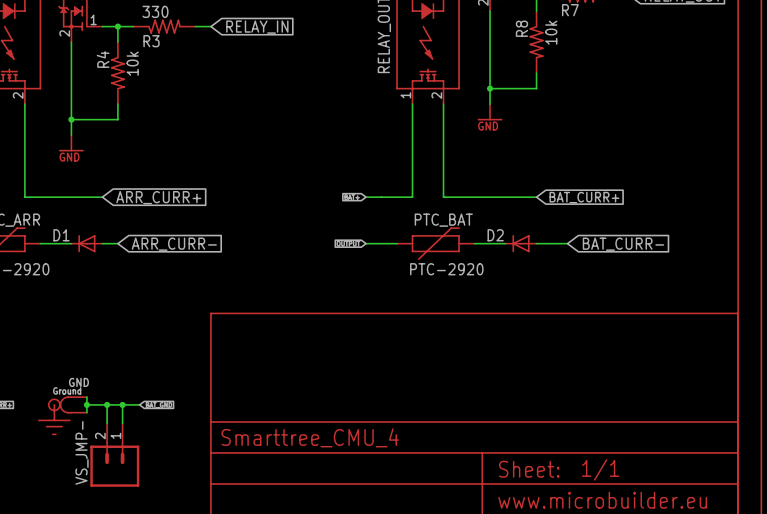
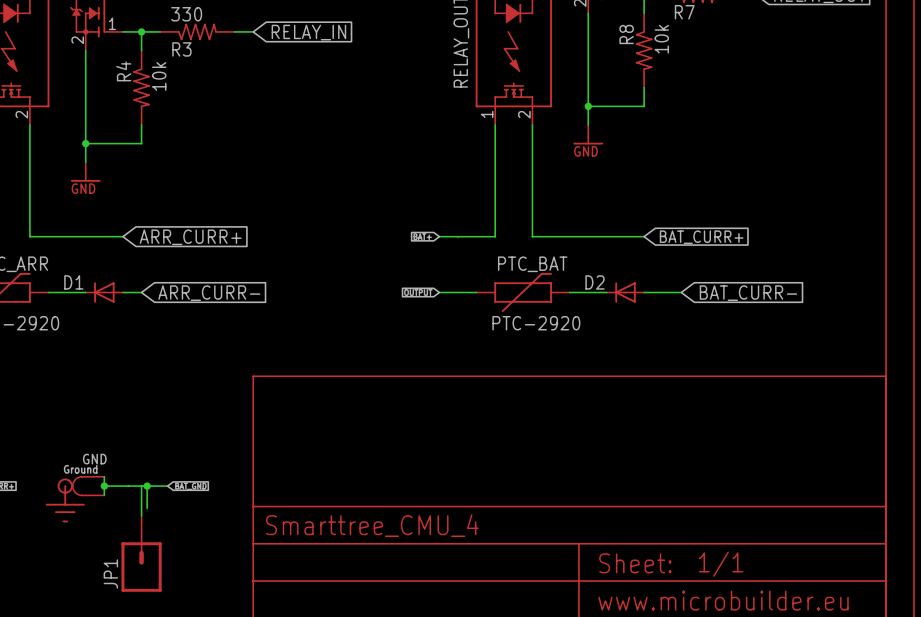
wire: (107, 404) (107, 423) -> none
junction: (107, 404) -> none
wire: none -> (141, 486) (141, 515)
VS_JMP-: (114, 455) -> none
JP1: none -> (141, 553)

